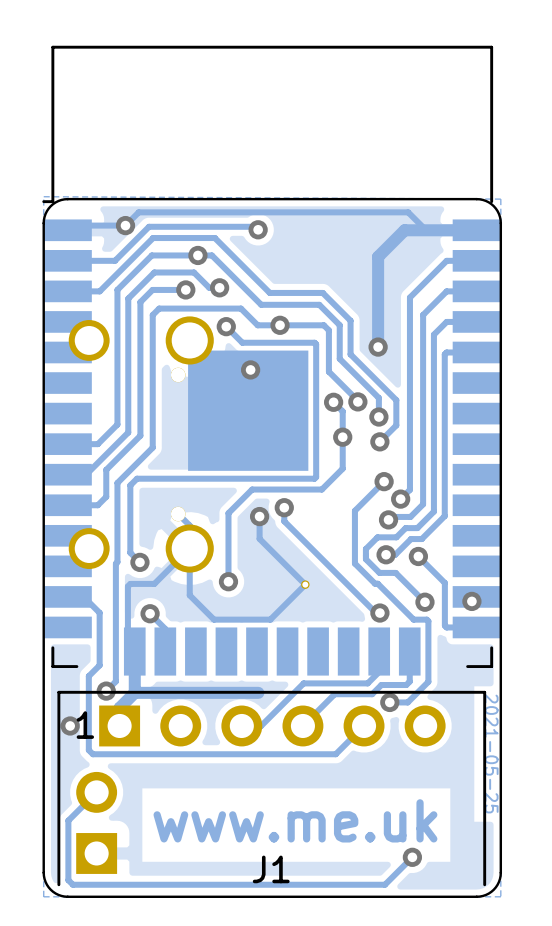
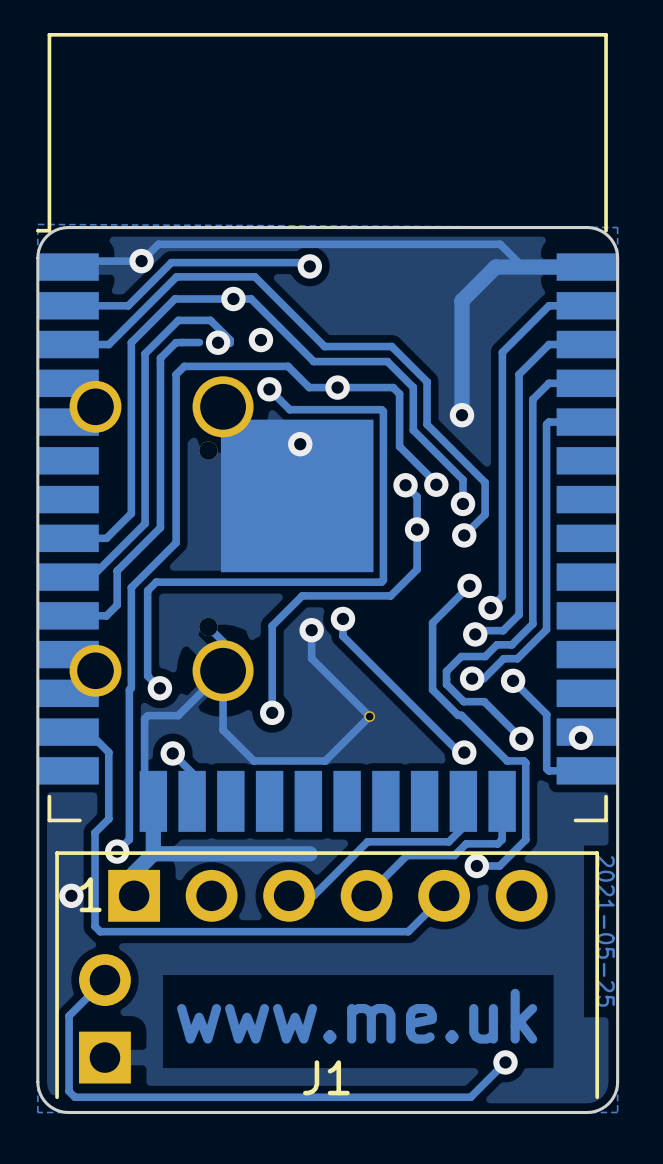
track: (154, 272) (193, 272) (209, 287) (219, 287) -> (178, 320) (210, 320) (230, 339) (230, 343)

